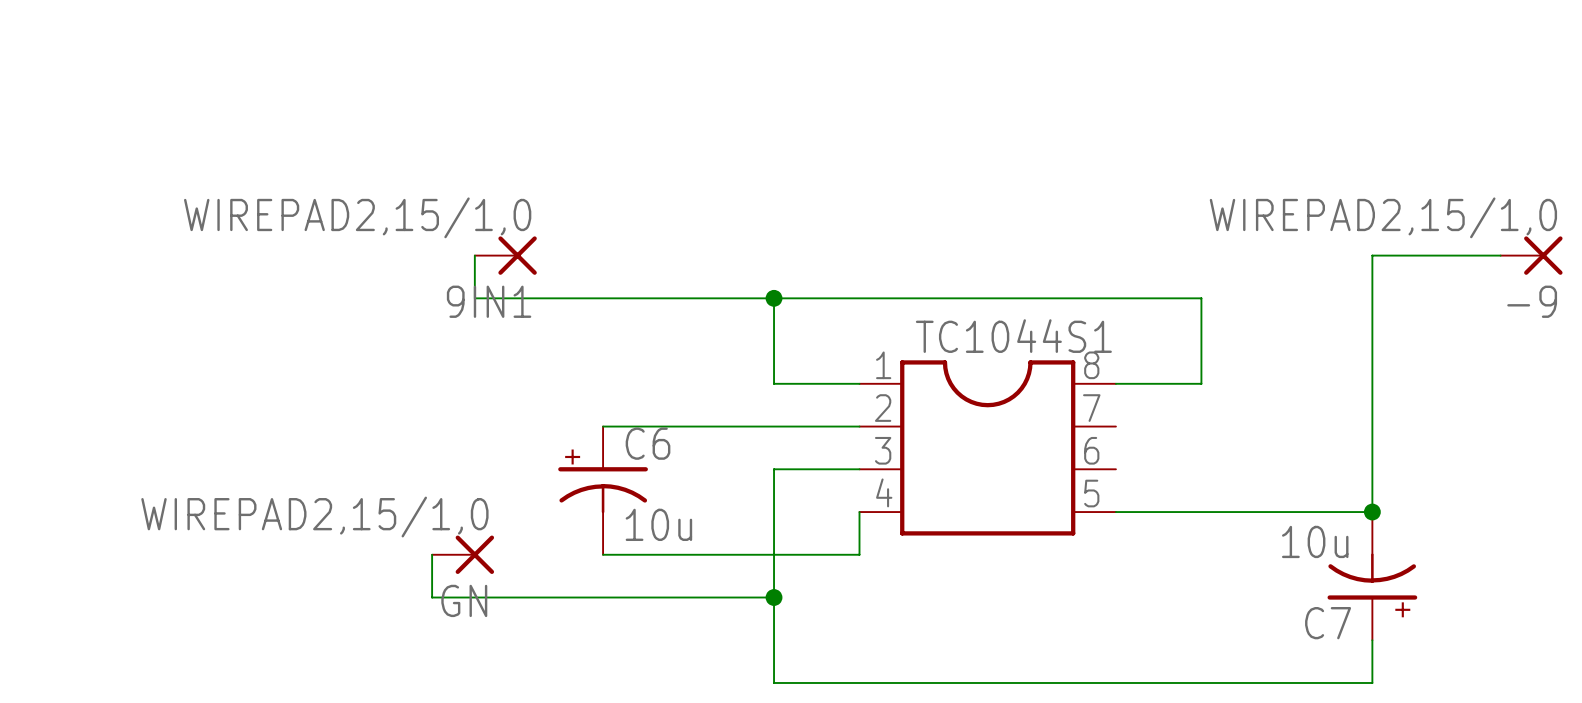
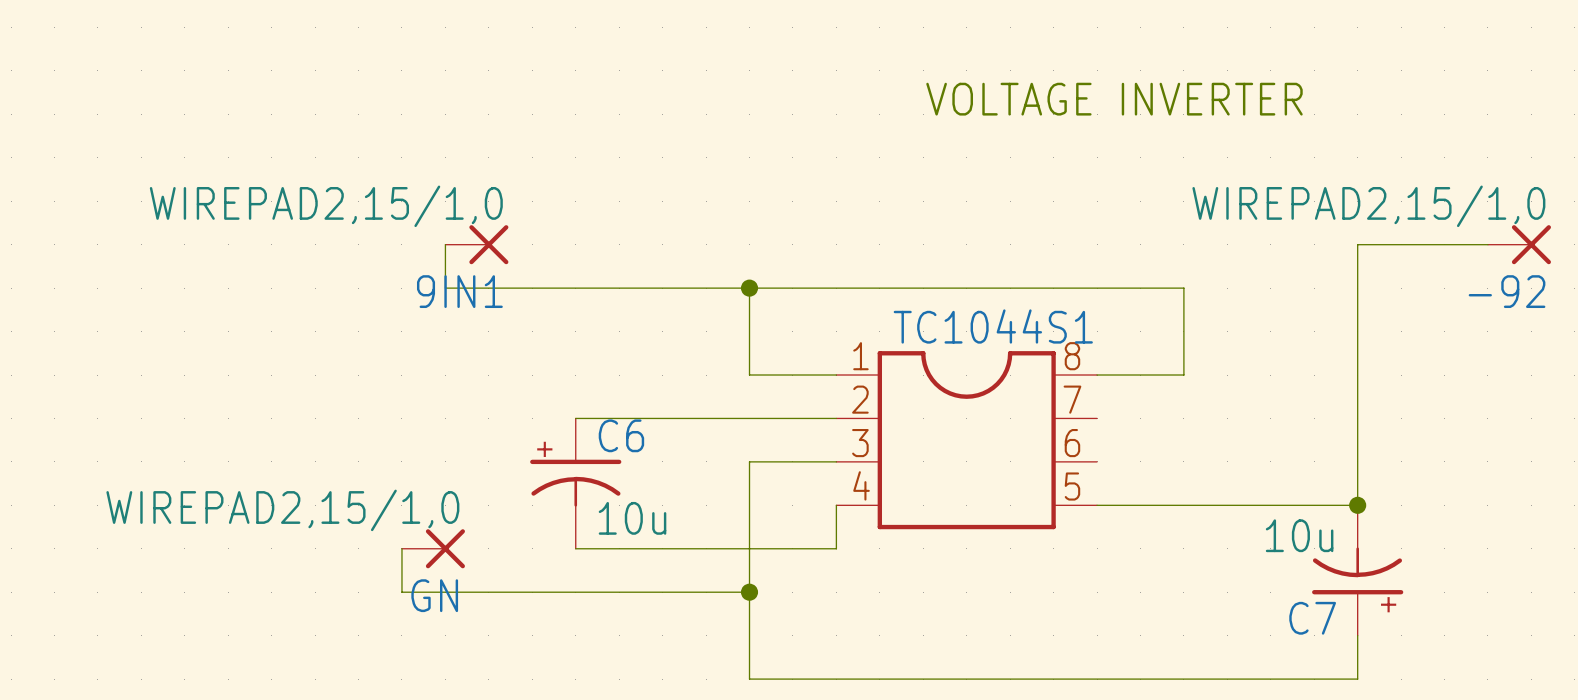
text: none -> VOLTAGE INVERTER (1114, 99)
-9 name: -9 (1532, 301) -> -92 (1507, 291)

